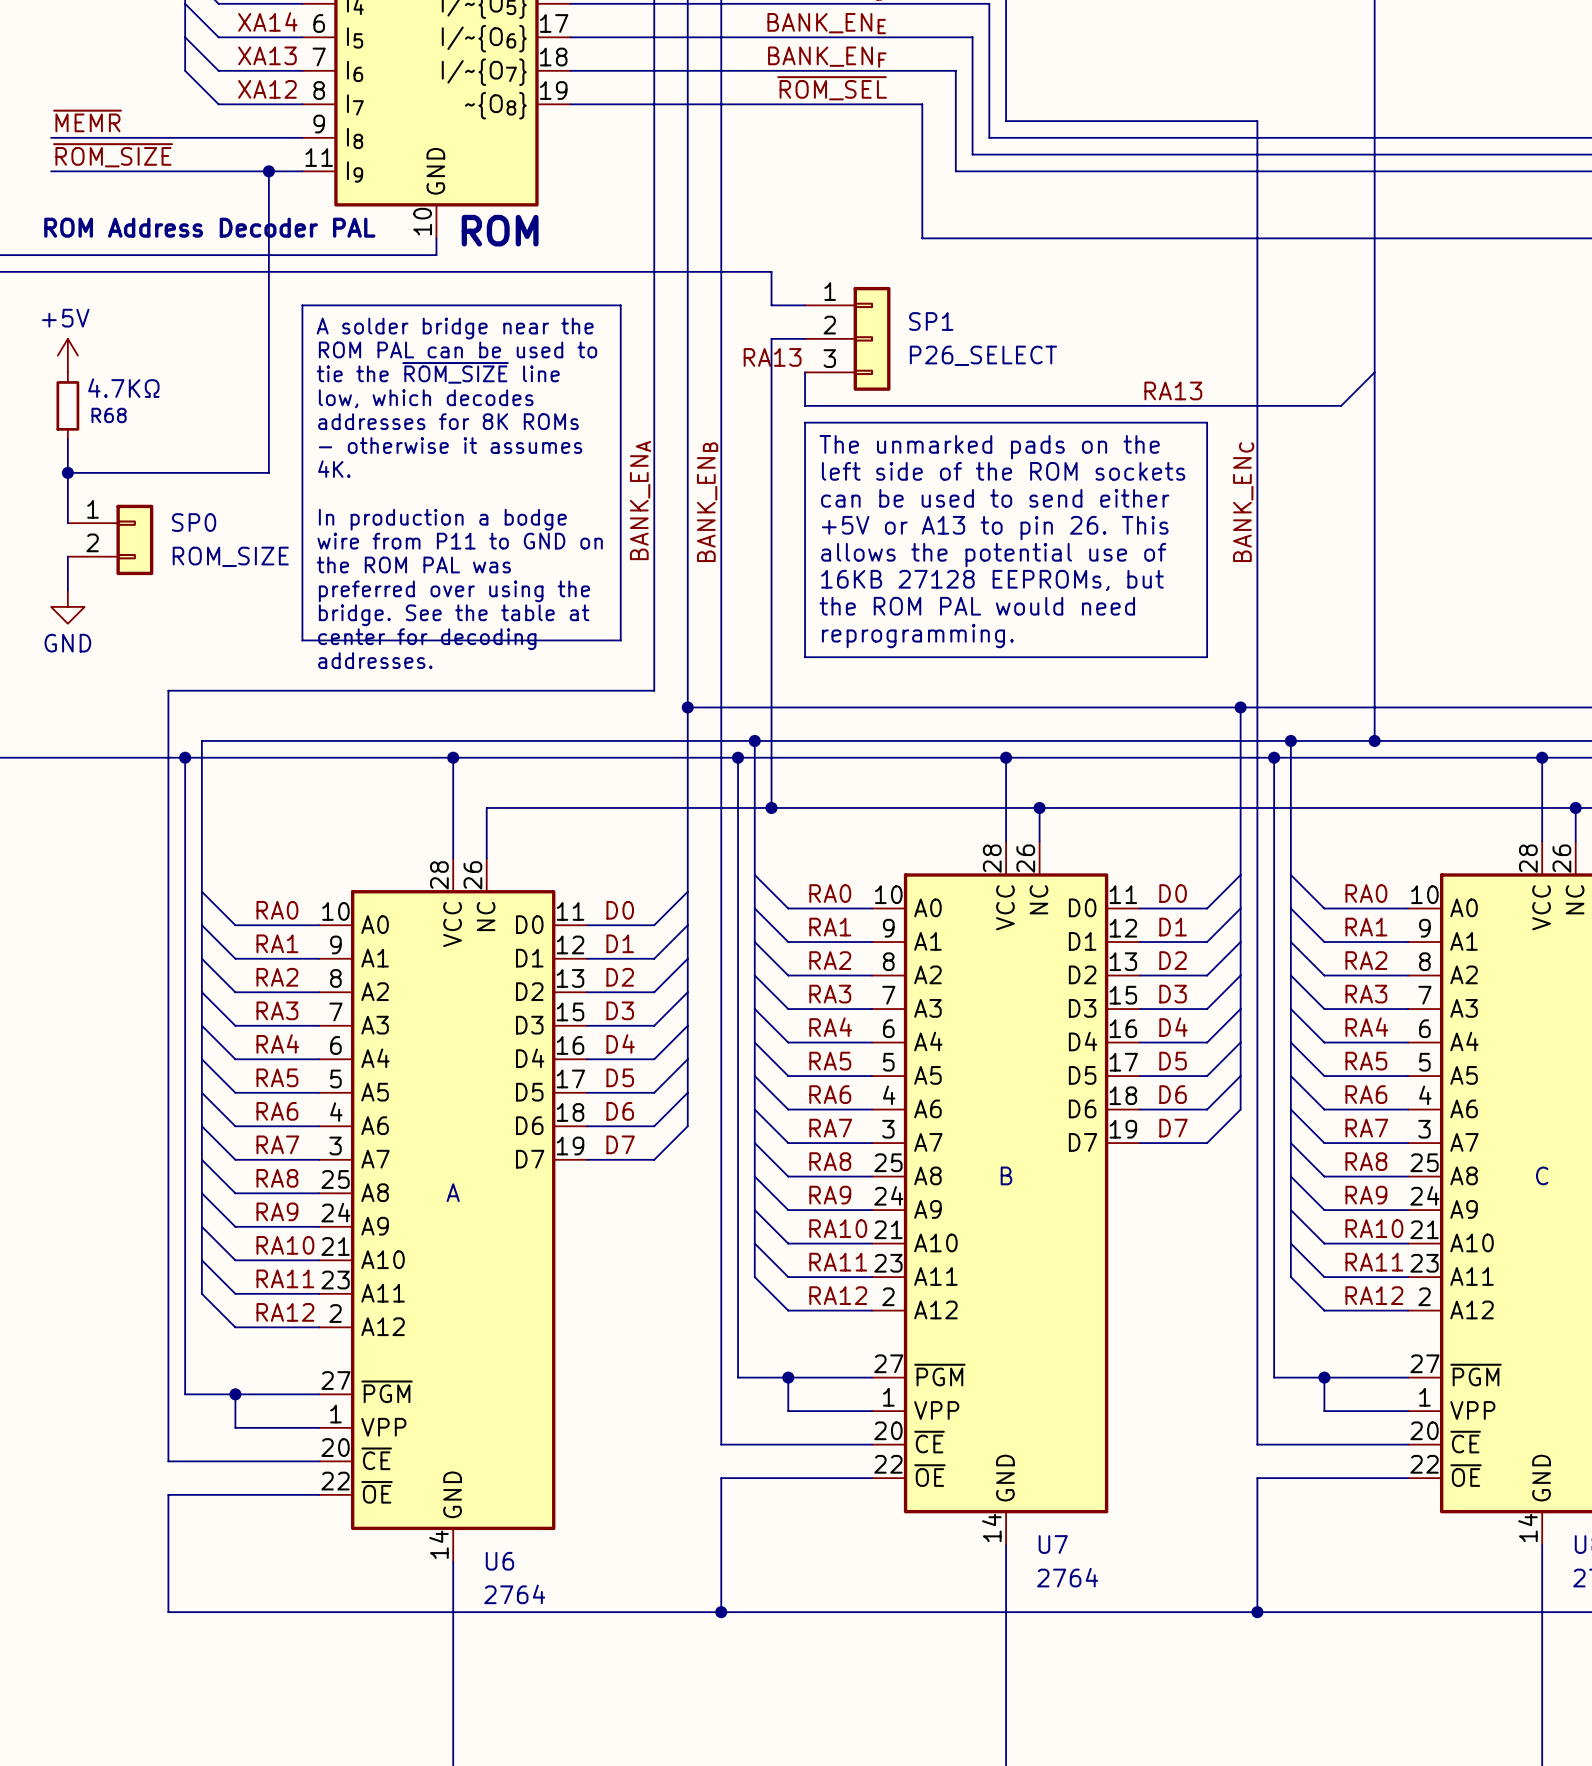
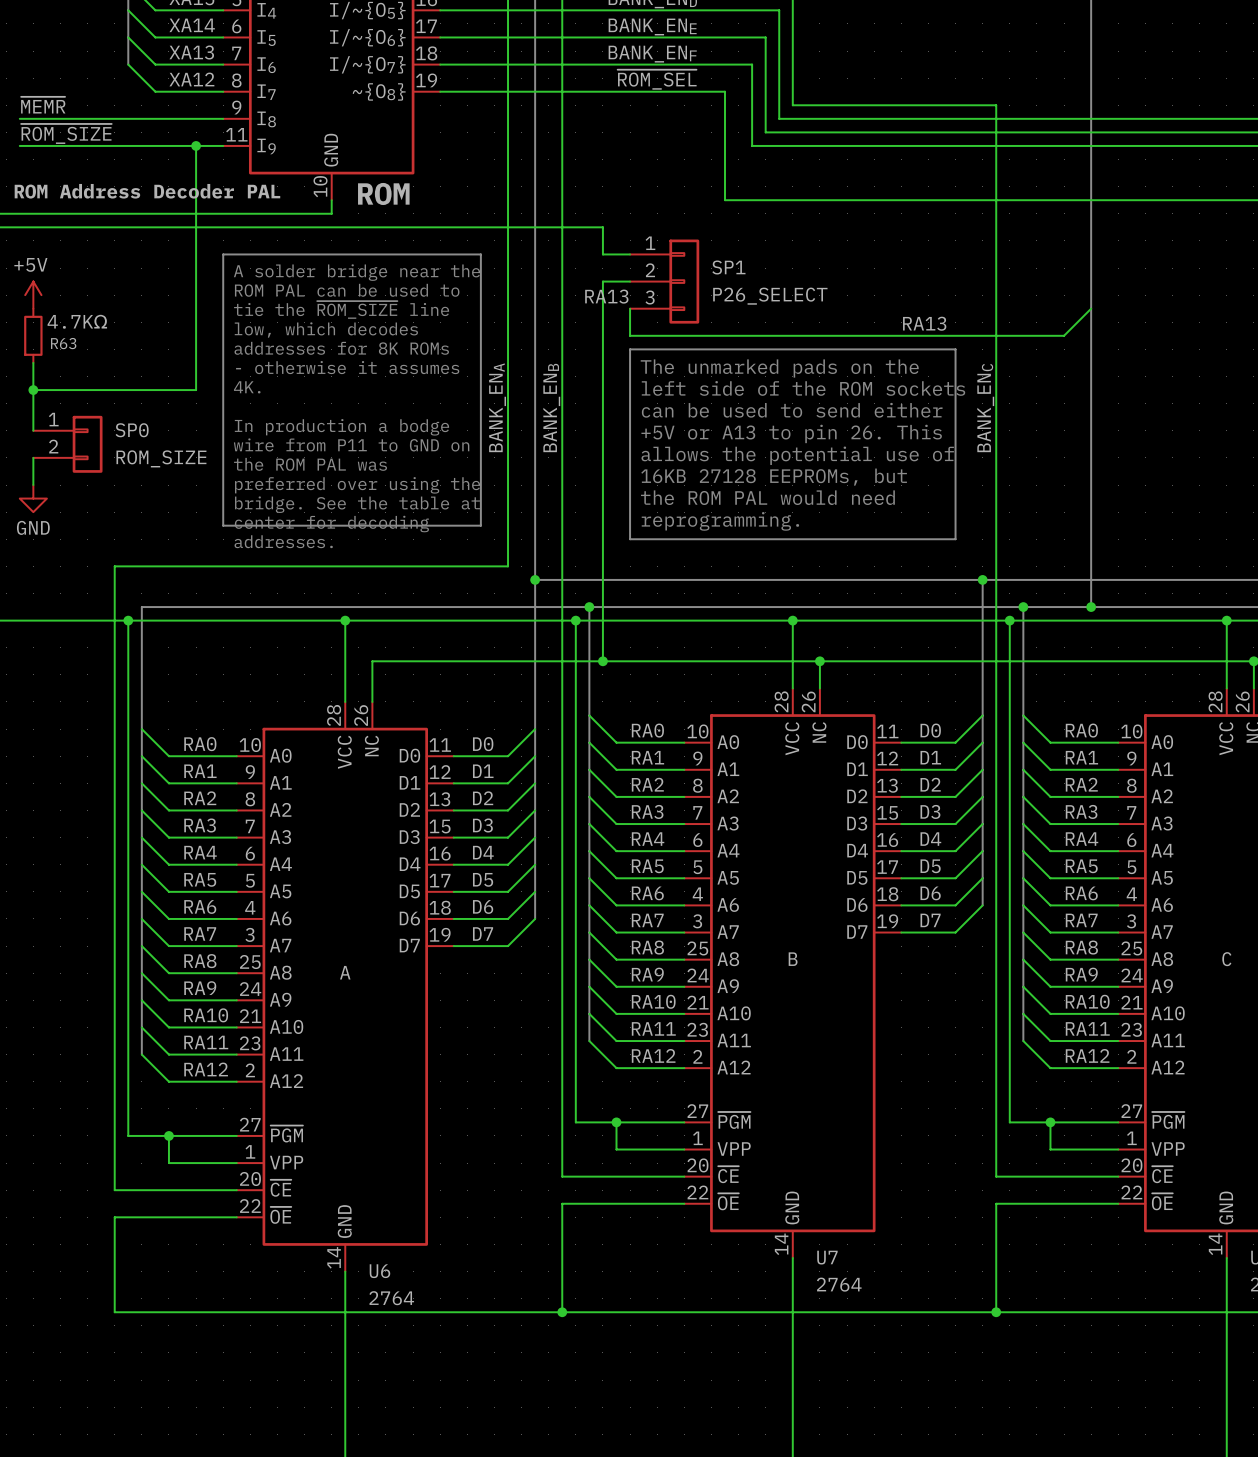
R68 name: R68 (109, 415) -> R63 (63, 343)

